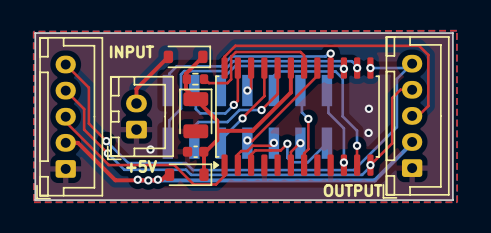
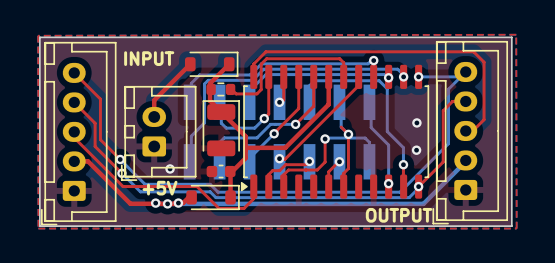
top track: none -> (341, 127) (348, 134)
top track: none -> (325, 138) (324, 162)
via position: (287, 143) -> (325, 138)
bottom track: (326, 143) (307, 162) (291, 162) (287, 157) (287, 143) -> (369, 161) (369, 142) (365, 138) (325, 138)

